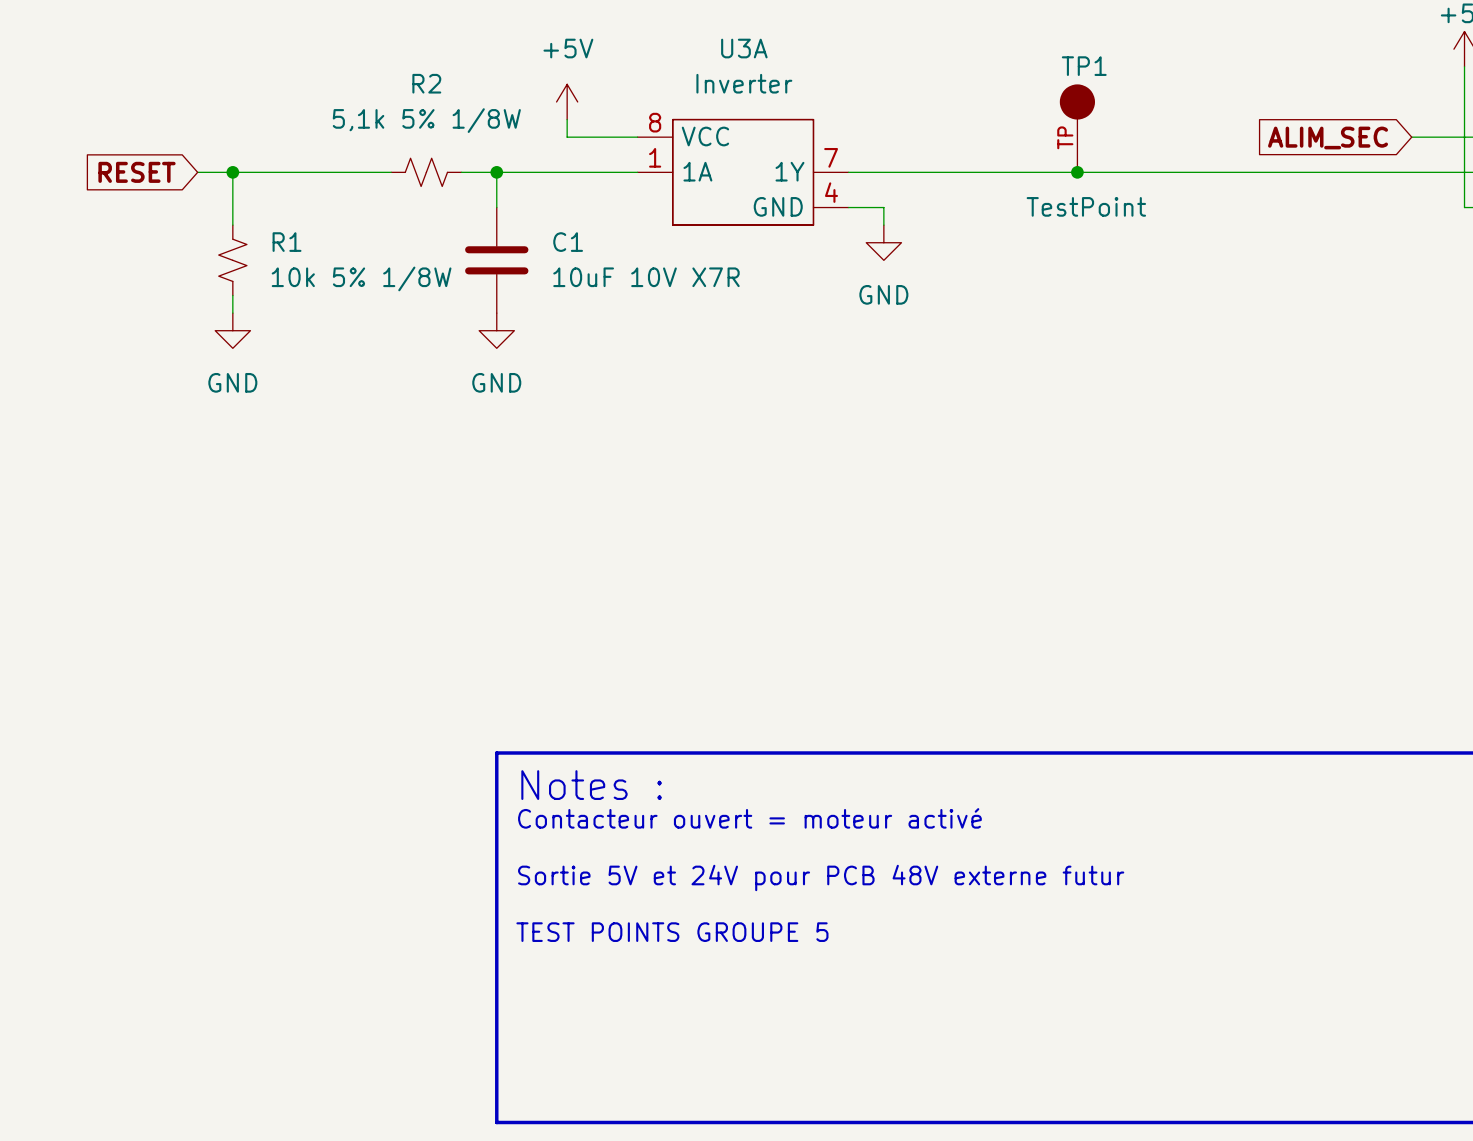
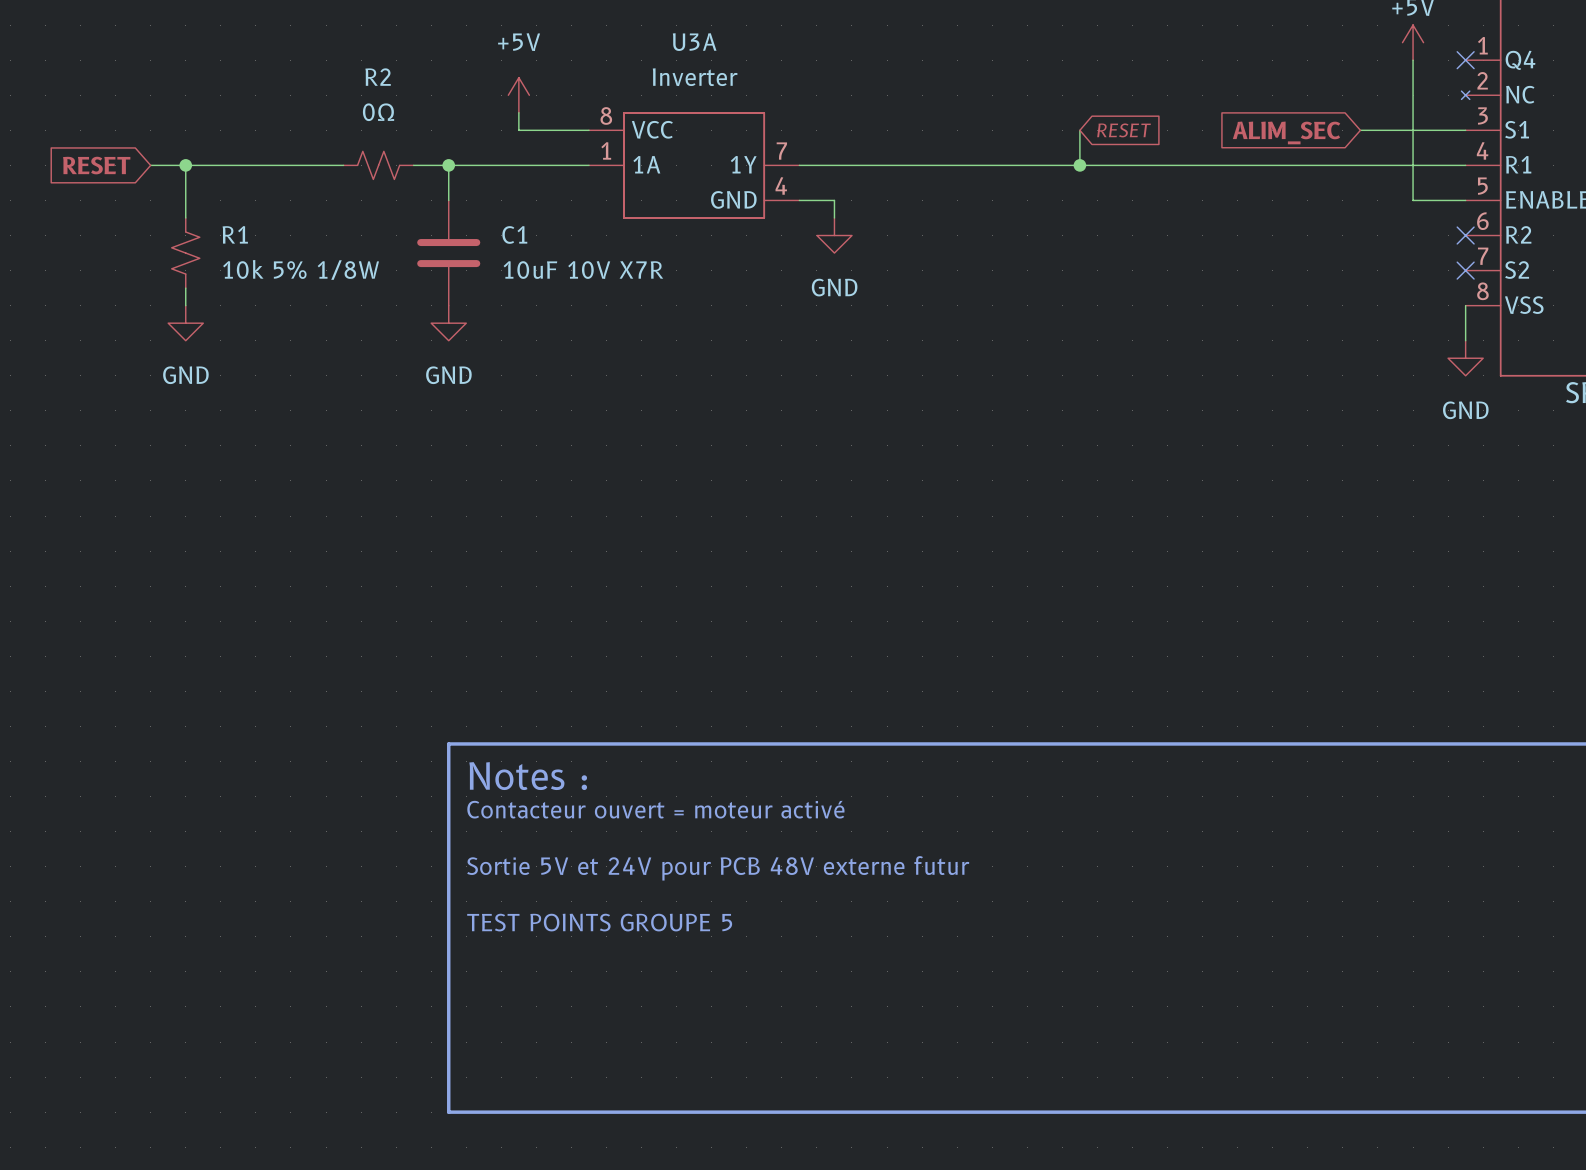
R2 value: 5,1k 5% 1/8W (426, 120) -> 0Ω (378, 112)
TP1: TestPoint (1077, 128) -> none
wire: none -> (1079, 130) (1079, 165)
global label: none -> RESET (1124, 130)
junction position: (1077, 172) -> (1079, 165)

